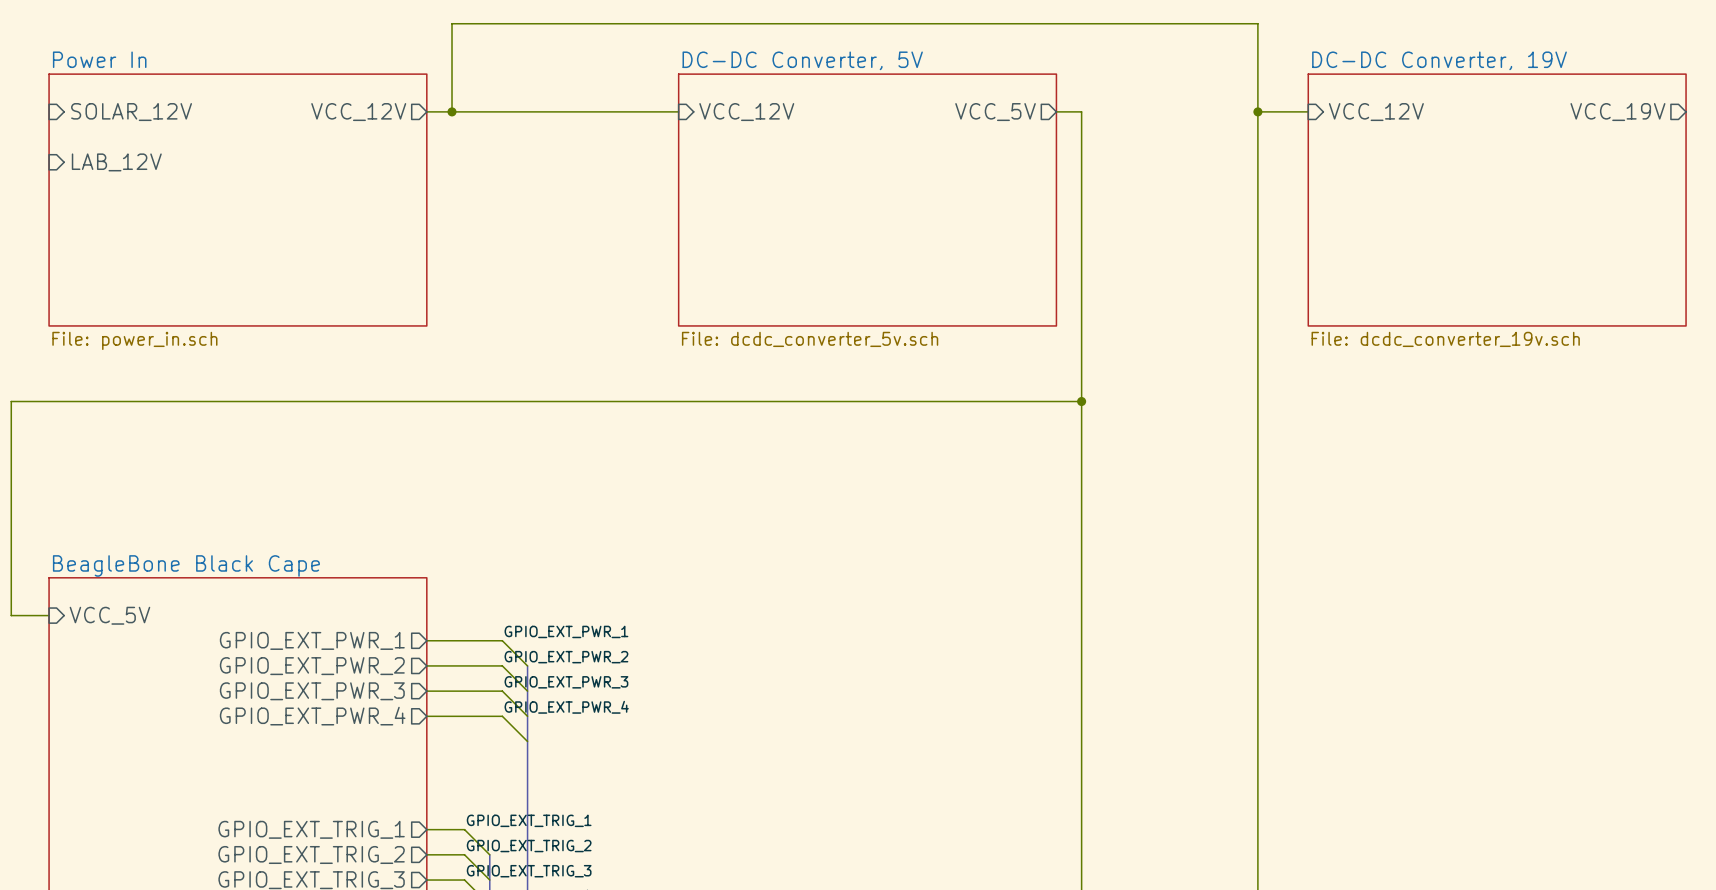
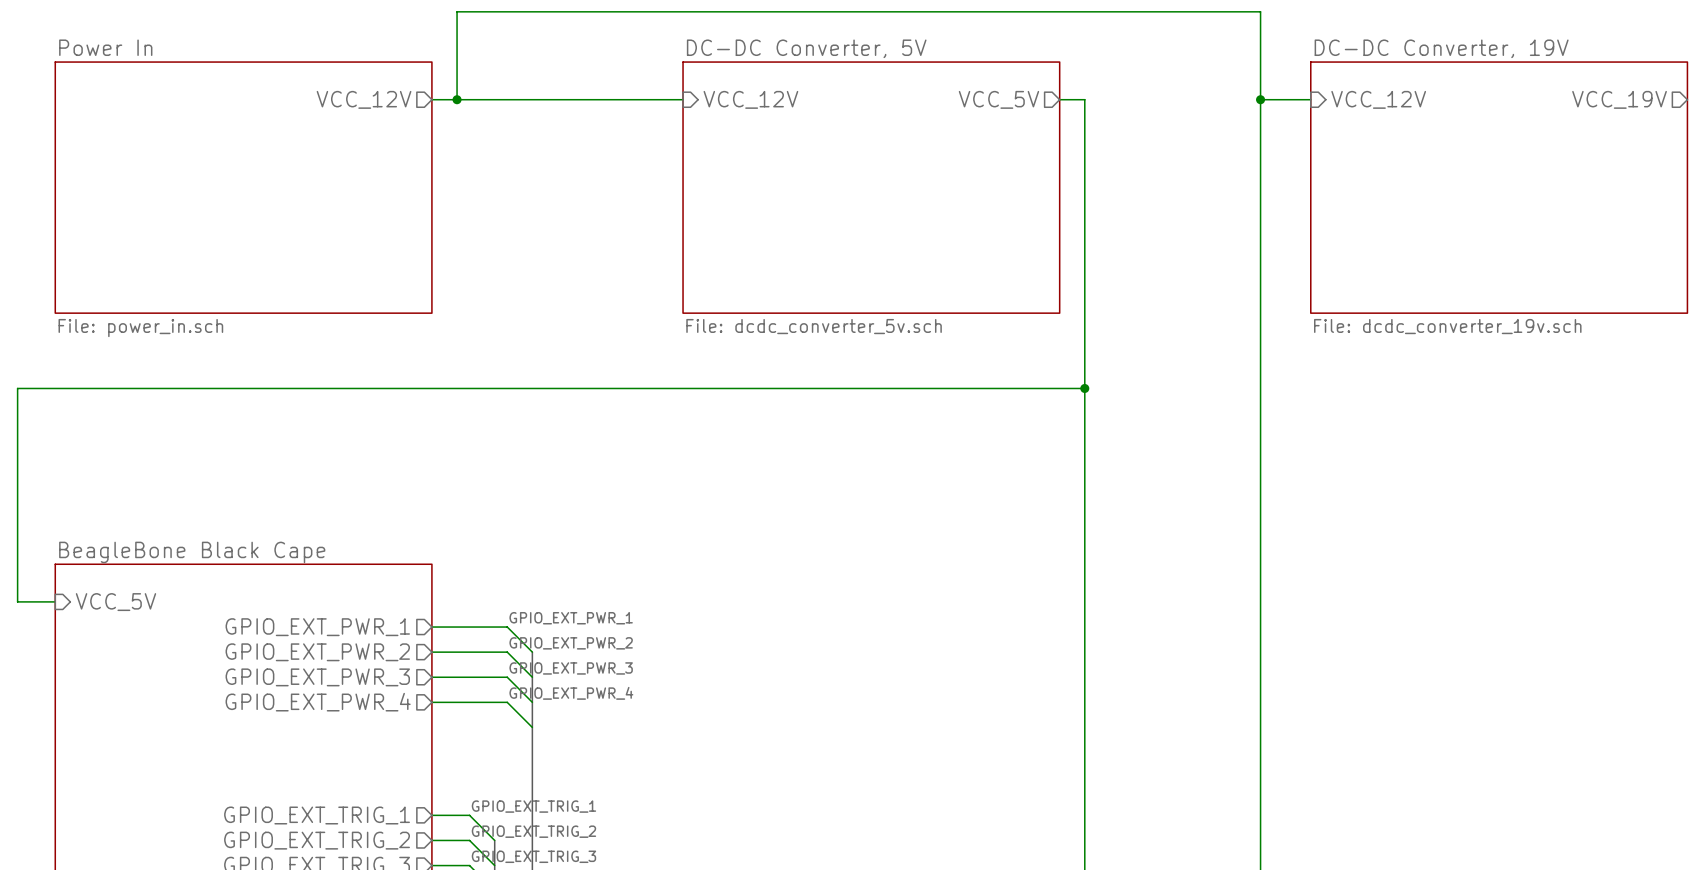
sheet pin: SOLAR_12V (131, 112) -> none
sheet pin: LAB_12V (116, 162) -> none

